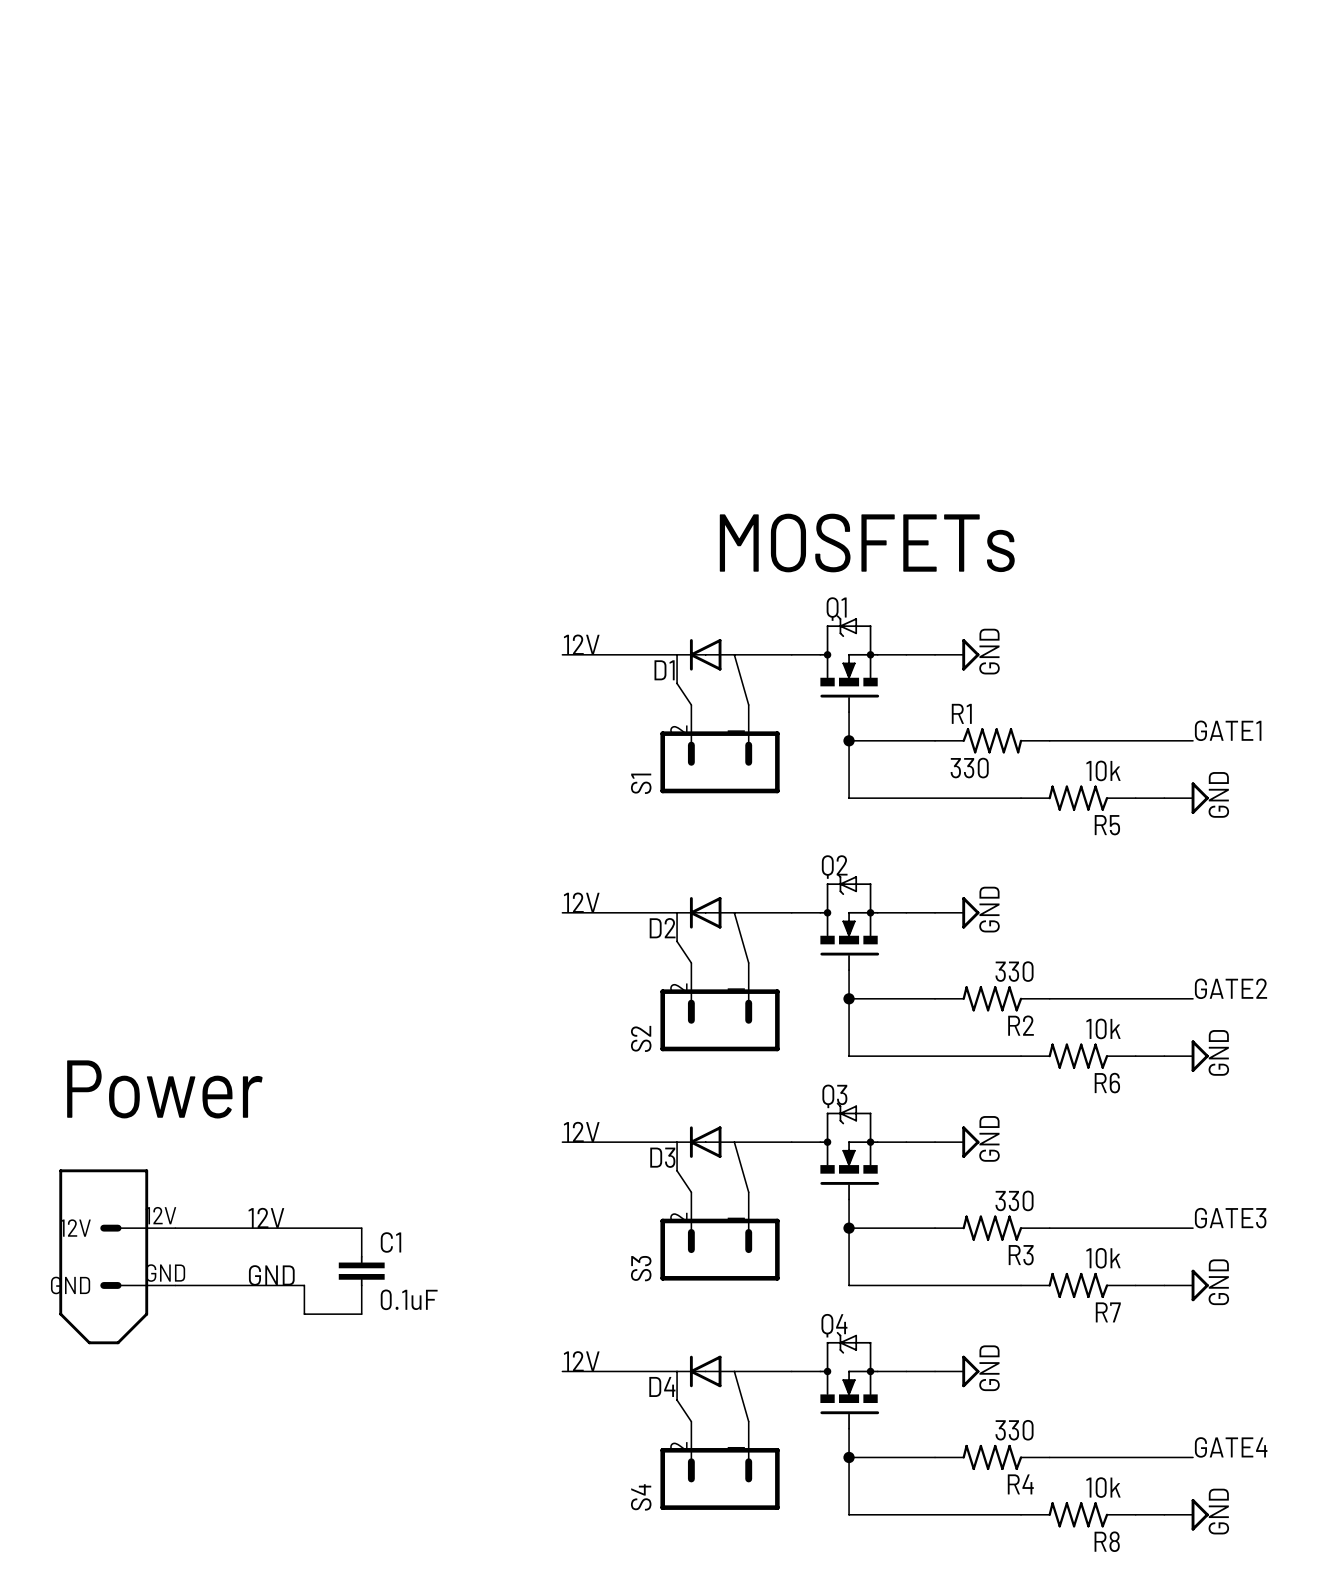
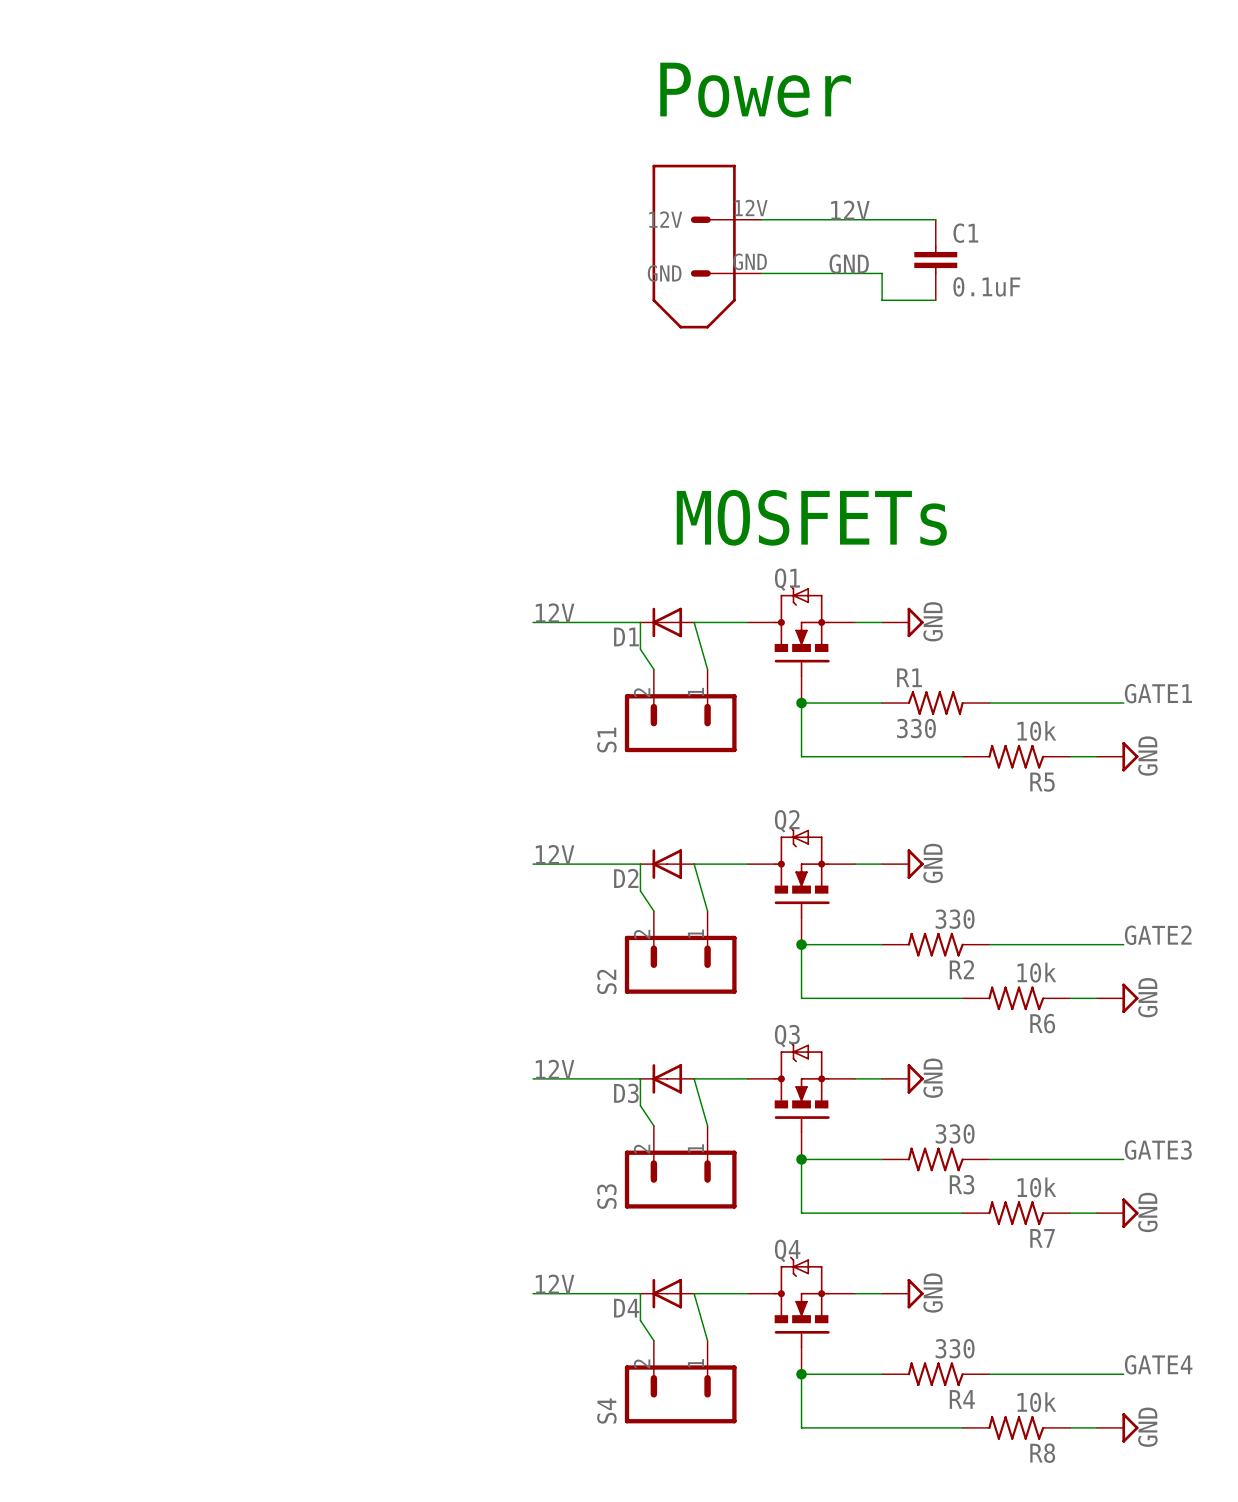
text: none -> Power (755, 90)
label: none -> 12V (850, 210)
wire: none -> (761, 219) (935, 219)
part: none -> (706, 246)
label: none -> GND (849, 264)
wire: none -> (761, 273) (882, 273) (882, 300) (935, 300)
text: Power (164, 1089) -> none
label: 12V (266, 1217) -> none
wire: (175, 1228) (361, 1228) -> none
part: (117, 1256) -> none
C1 position: (361, 1271) -> (935, 260)
label: GND (271, 1275) -> none
wire: (175, 1285) (304, 1285) (304, 1314) (361, 1314) -> none

